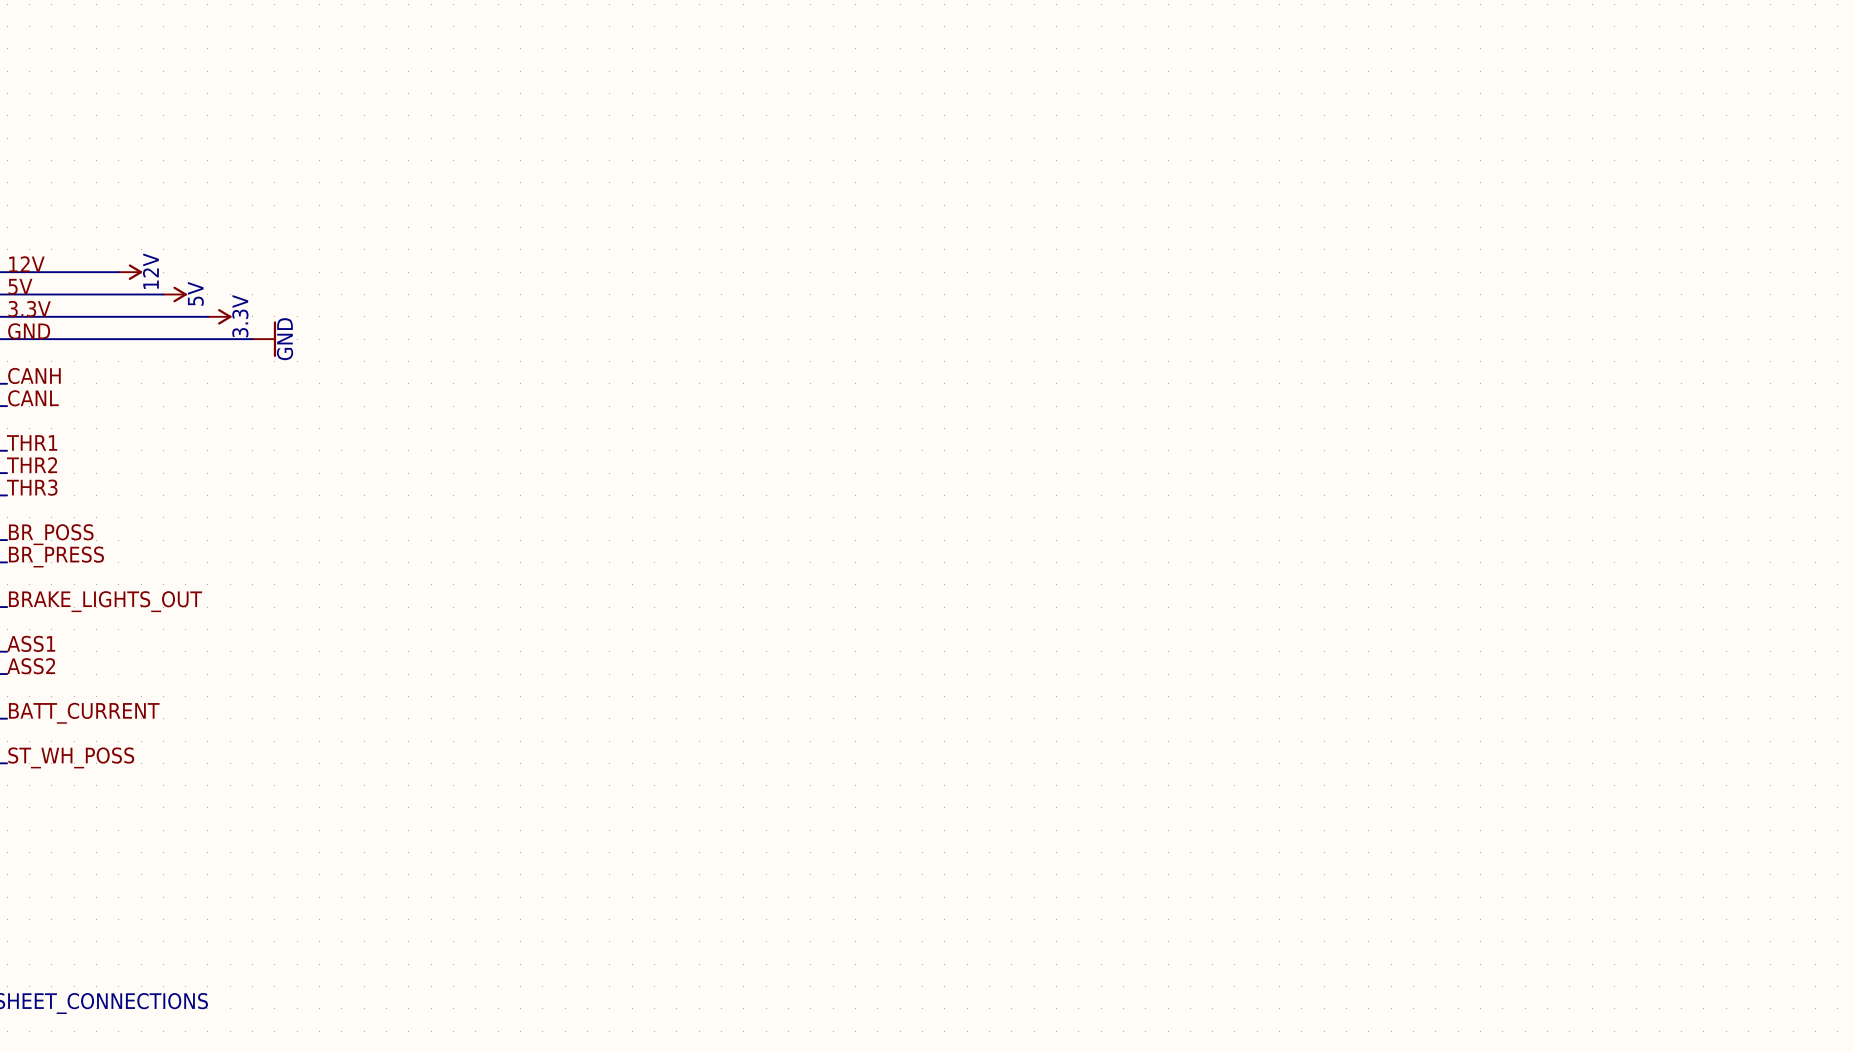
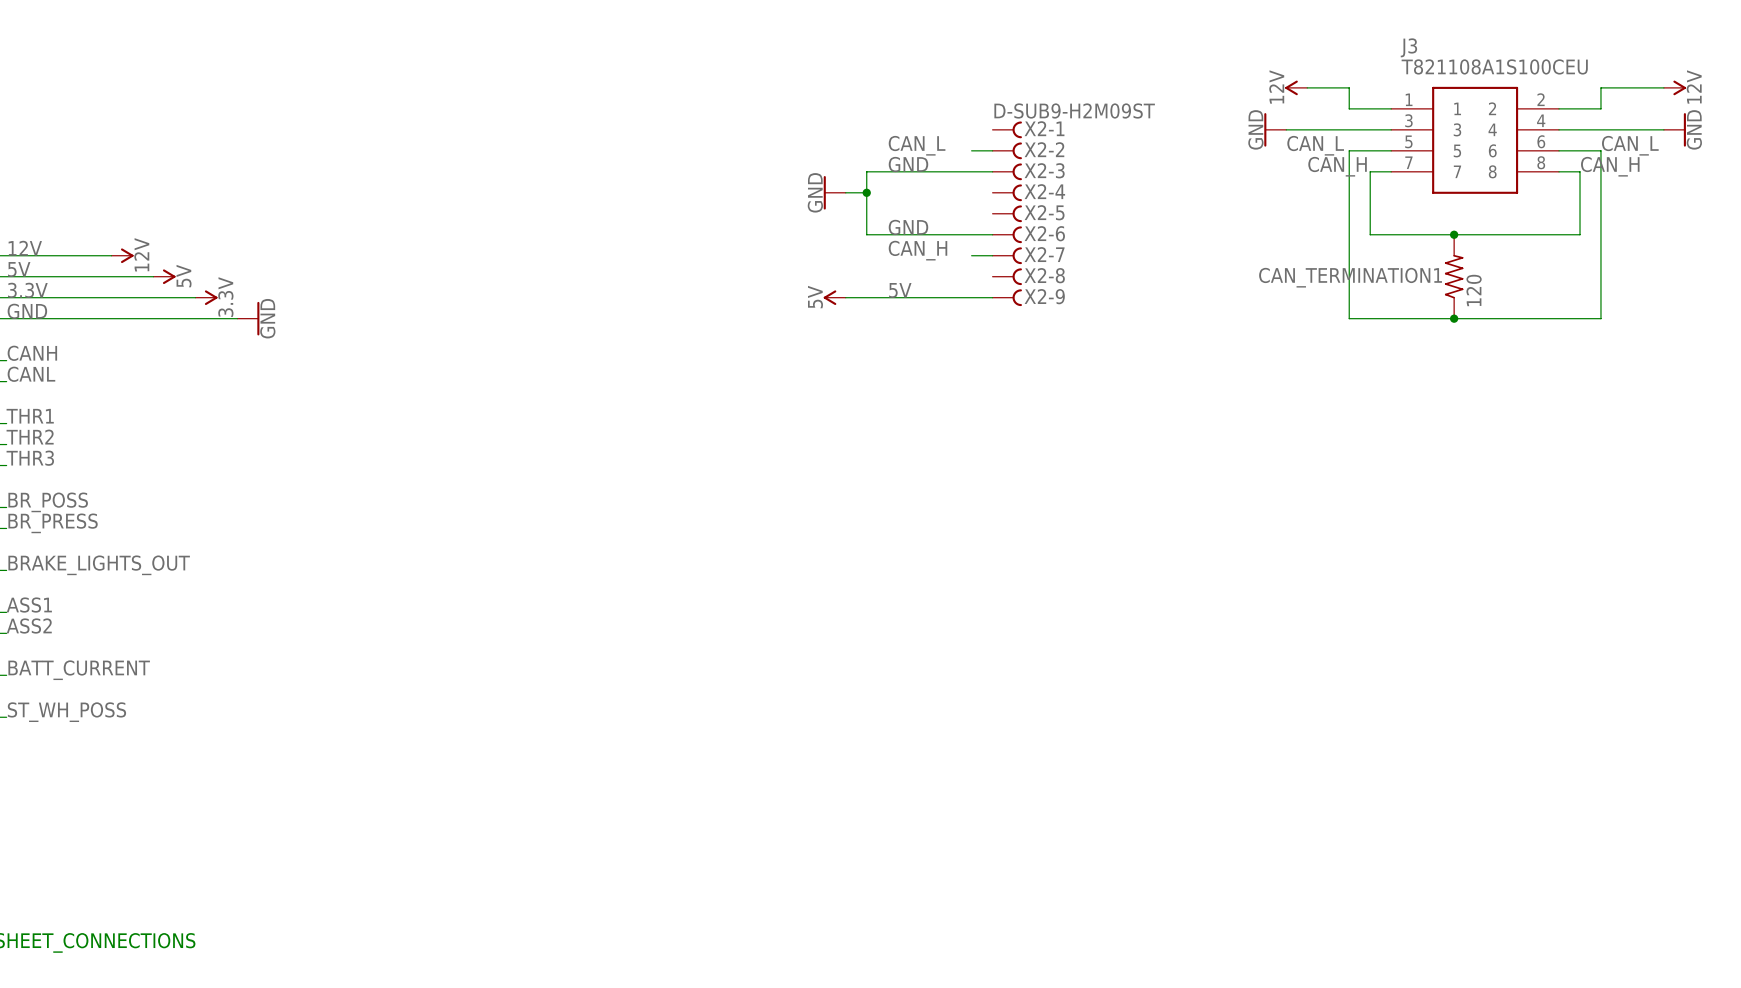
power symbol: none -> 12V (1296, 87)
wire: none -> (1307, 87) (1349, 87) (1349, 108) (1391, 108)
wire: none -> (1663, 87) (1600, 87) (1600, 108) (1559, 108)
power symbol: none -> 12V (1674, 87)
X2-1: none -> D-SUB9-H2M09ST (1007, 129)
power symbol: none -> GND (1275, 129)
wire: none -> (1286, 129) (1391, 129)
wire: none -> (1559, 129) (1663, 129)
power symbol: none -> GND (1674, 129)
J3: none -> T821108A1S100CEU (1475, 140)
label: none -> CAN_L (917, 145)
label: none -> CAN_L (1315, 145)
label: none -> CAN_L (1630, 145)
wire: none -> (971, 150) (992, 150)
X2-2: none -> (1007, 150)
wire: none -> (1391, 150) (1349, 150) (1349, 318) (1600, 318) (1600, 150) (1559, 150)
label: none -> GND (908, 164)
label: none -> CAN_H (1337, 166)
label: none -> CAN_H (1610, 166)
wire: none -> (992, 171) (866, 171) (866, 234) (992, 234)
X2-3: none -> (1007, 171)
wire: none -> (1391, 171) (1370, 171) (1370, 234) (1580, 234) (1580, 171) (1559, 171)
power symbol: none -> GND (834, 192)
wire: none -> (845, 192) (866, 192)
junction: none -> (866, 192)
X2-4: none -> (1007, 192)
X2-5: none -> (1007, 213)
label: none -> GND (908, 227)
X2-6: none -> (1007, 234)
junction: none -> (1454, 234)
label: none -> CAN_H (917, 250)
wire: none -> (971, 255) (992, 255)
X2-7: none -> (1007, 255)
X2-8: none -> (1007, 276)
CAN_TERMINATION1: none -> 120 (1454, 276)
label: none -> 5V (900, 290)
power symbol: none -> 5V (834, 297)
wire: none -> (845, 297) (992, 297)
X2-9: none -> (1007, 297)
junction: none -> (1454, 318)

